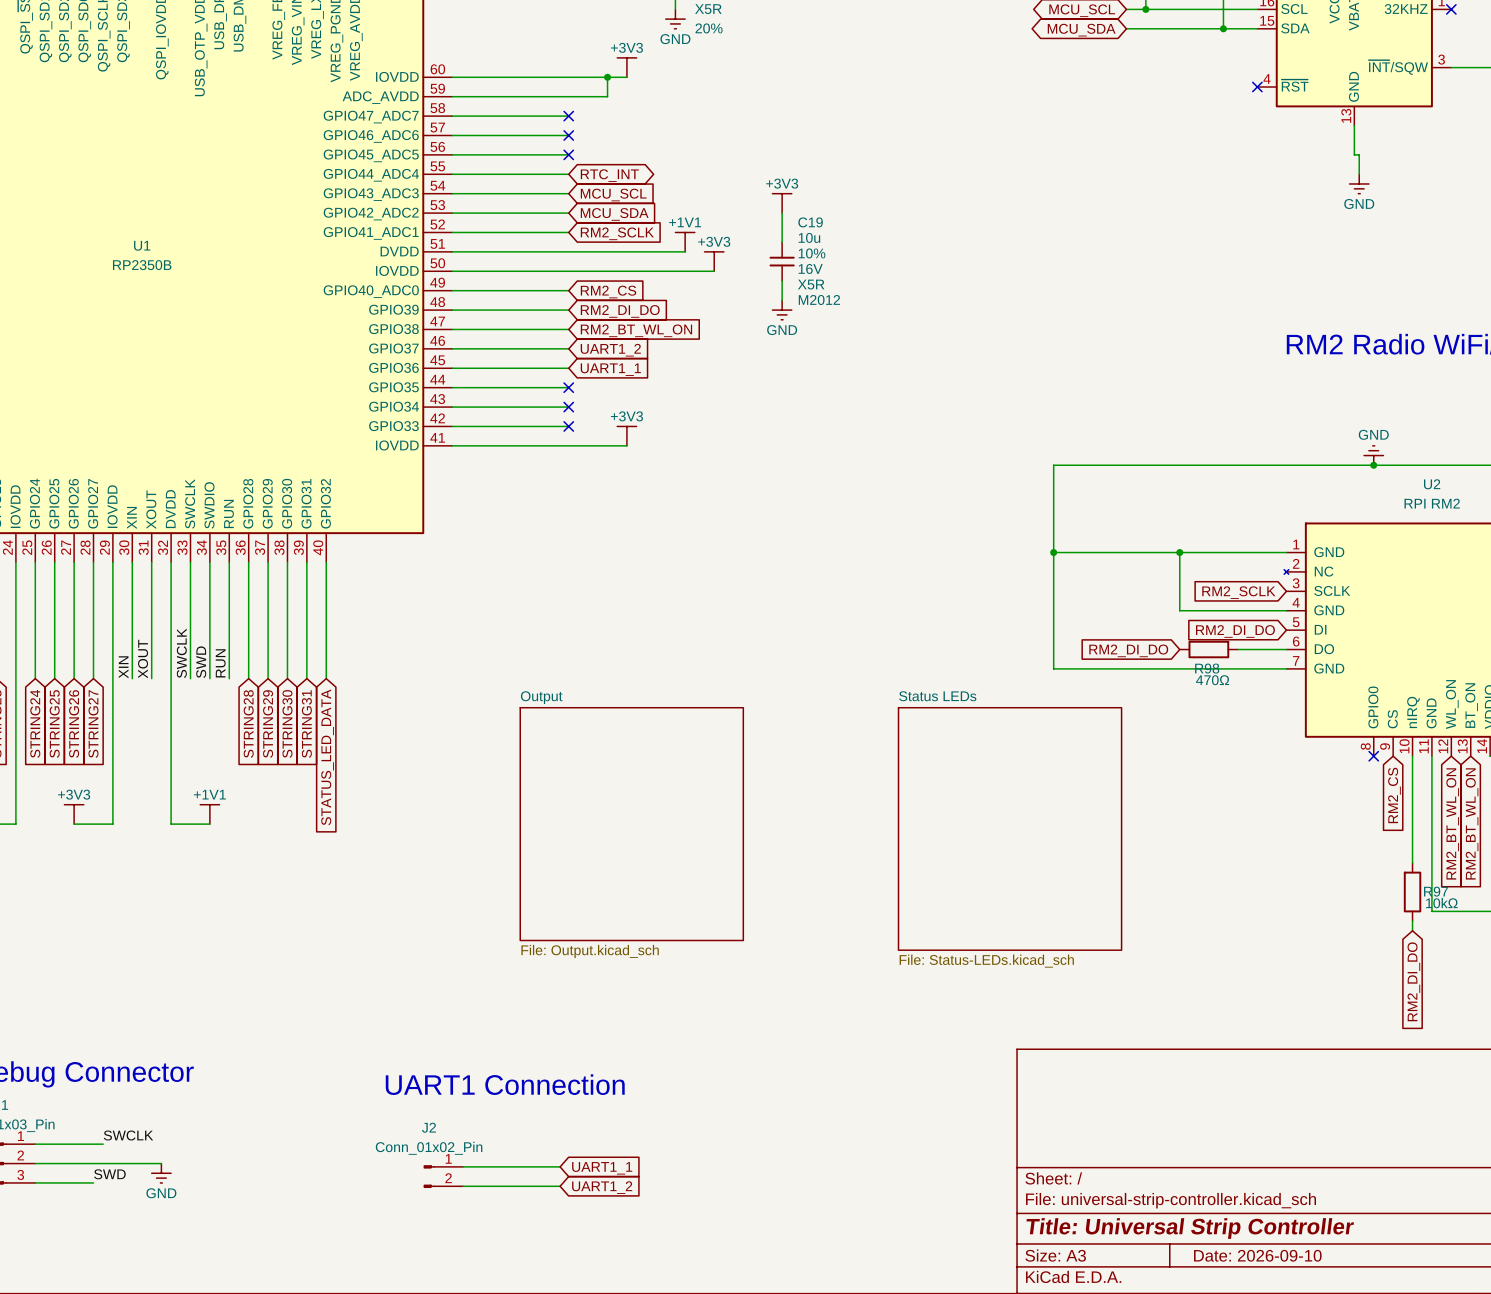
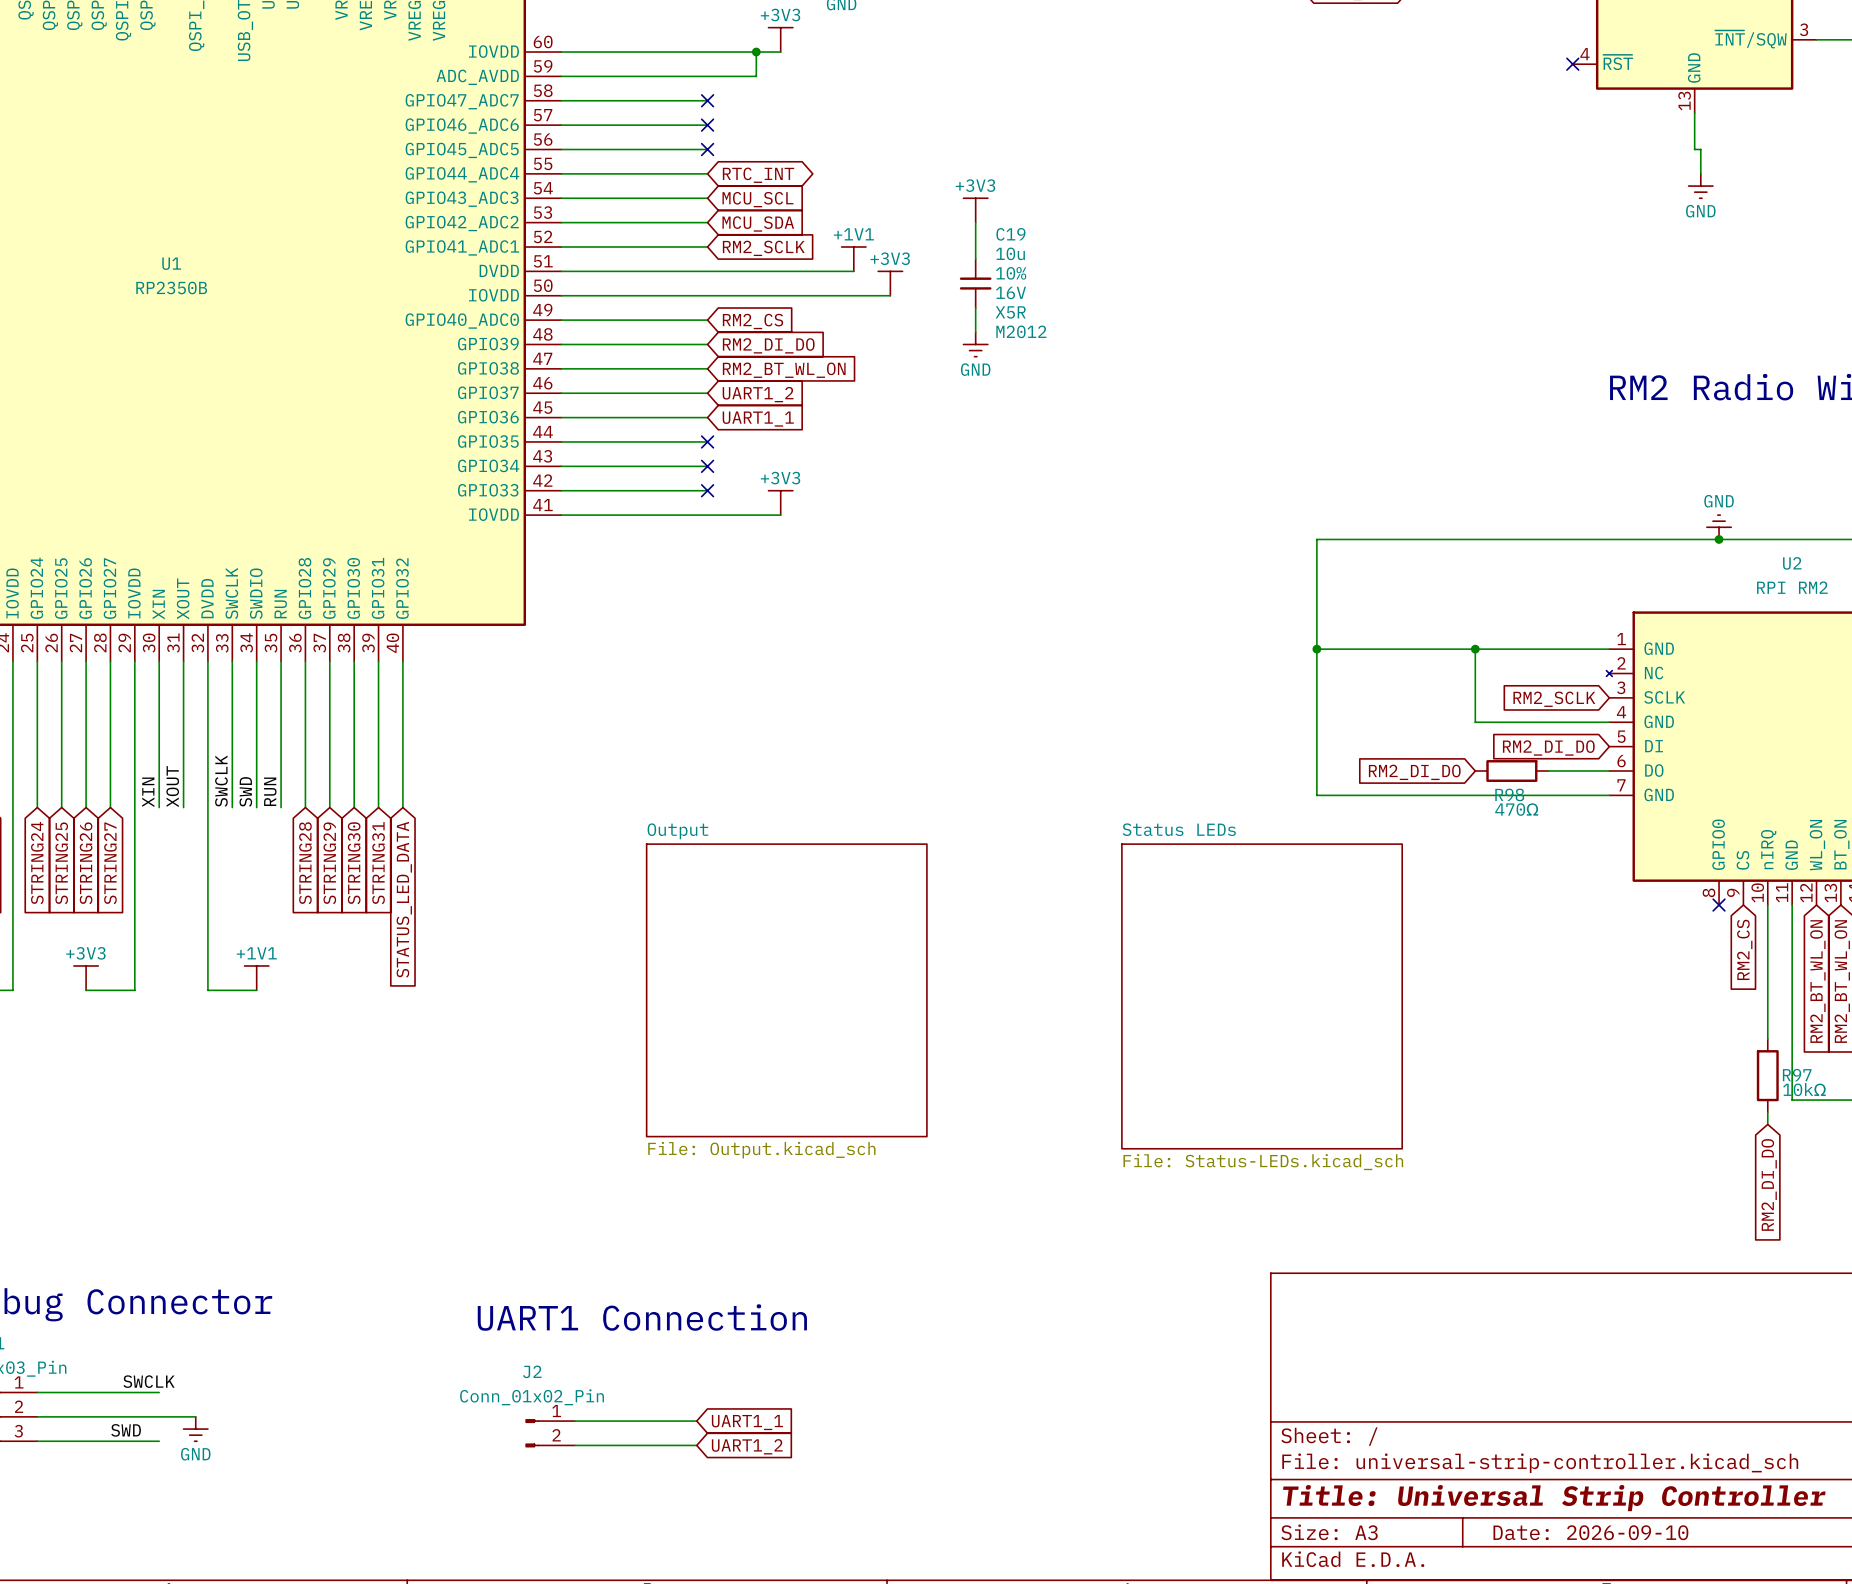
wire: none -> (122, 1392) (159, 1392)
wire: none -> (110, 1441) (159, 1441)

